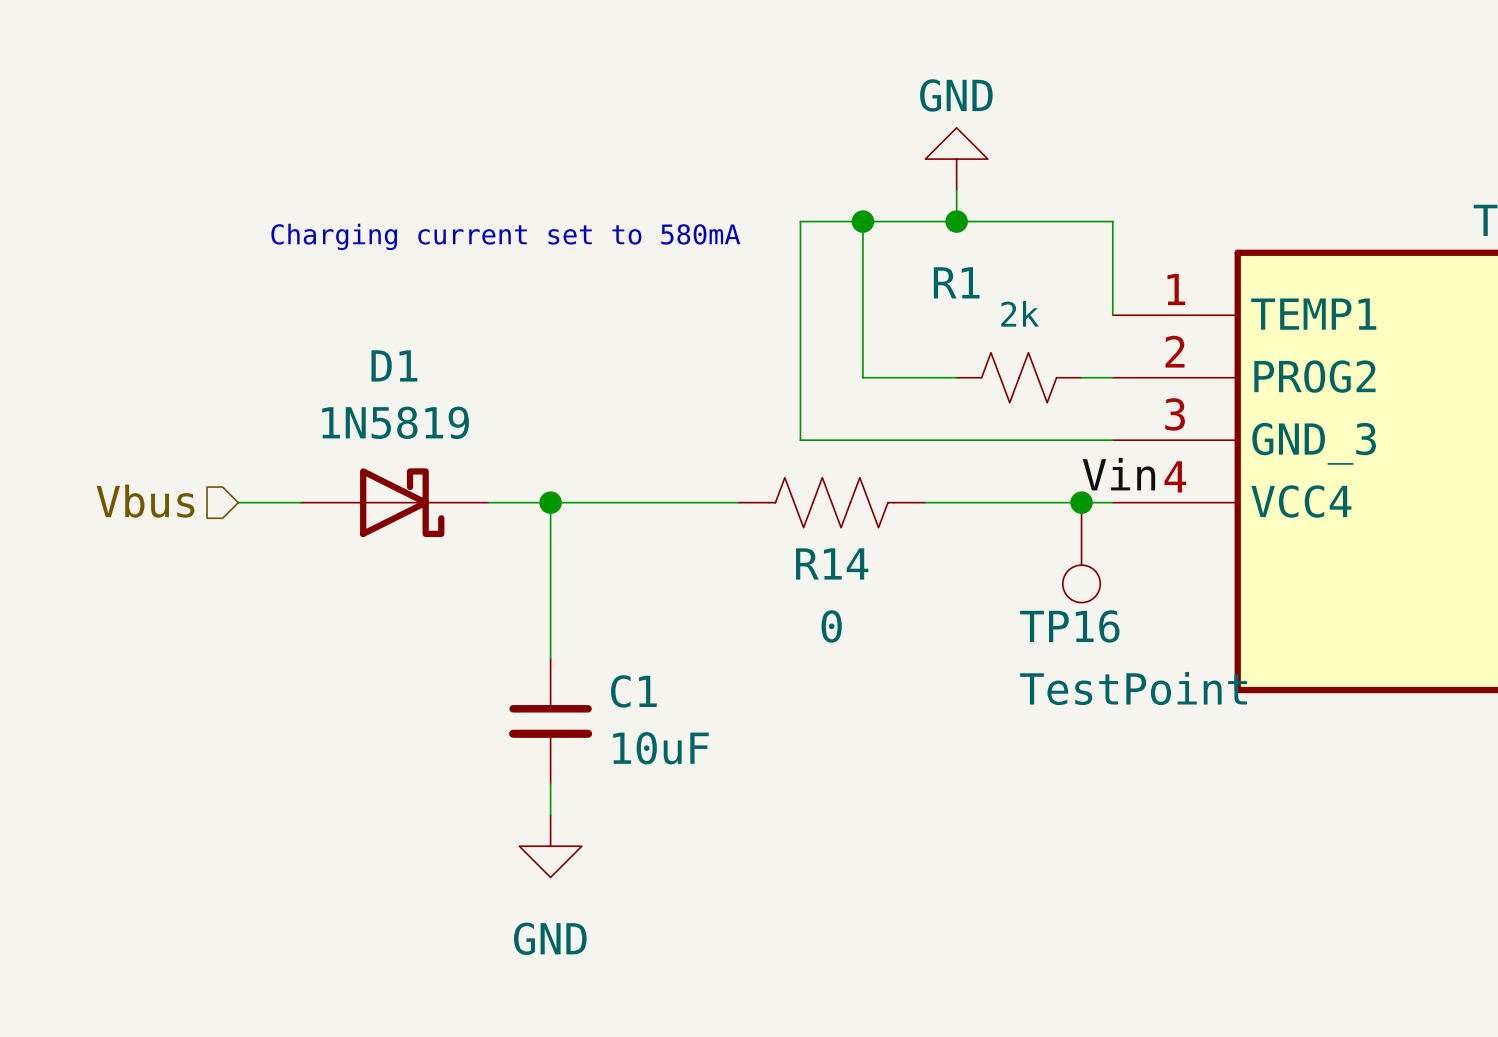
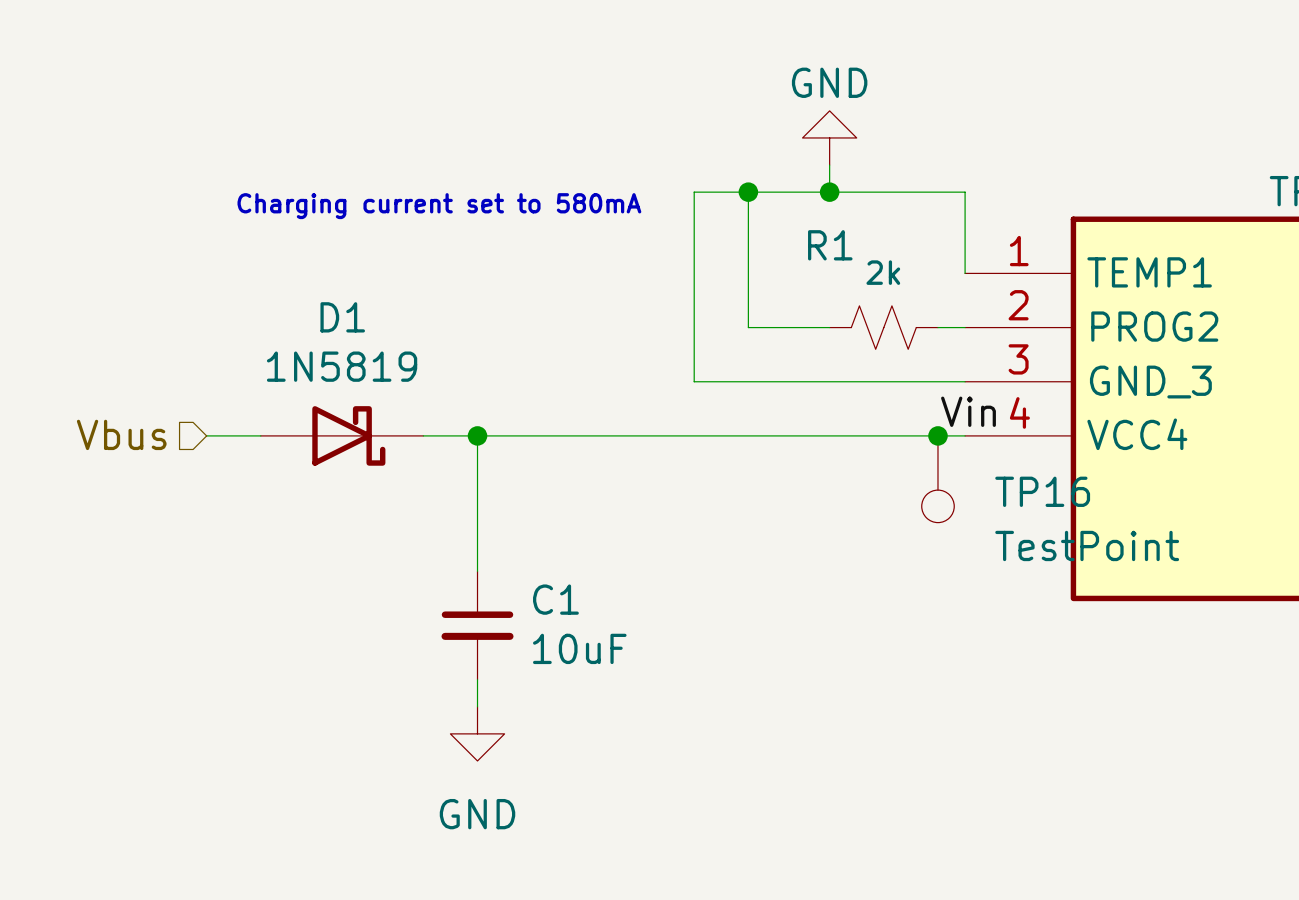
wire: none -> (640, 435) (802, 435)
R14: 0 (831, 502) -> none
TP16 name position: TP16 (1069, 626) -> TP16 (1042, 491)
TP16 value position: TestPoint (1133, 688) -> TestPoint (1087, 545)

